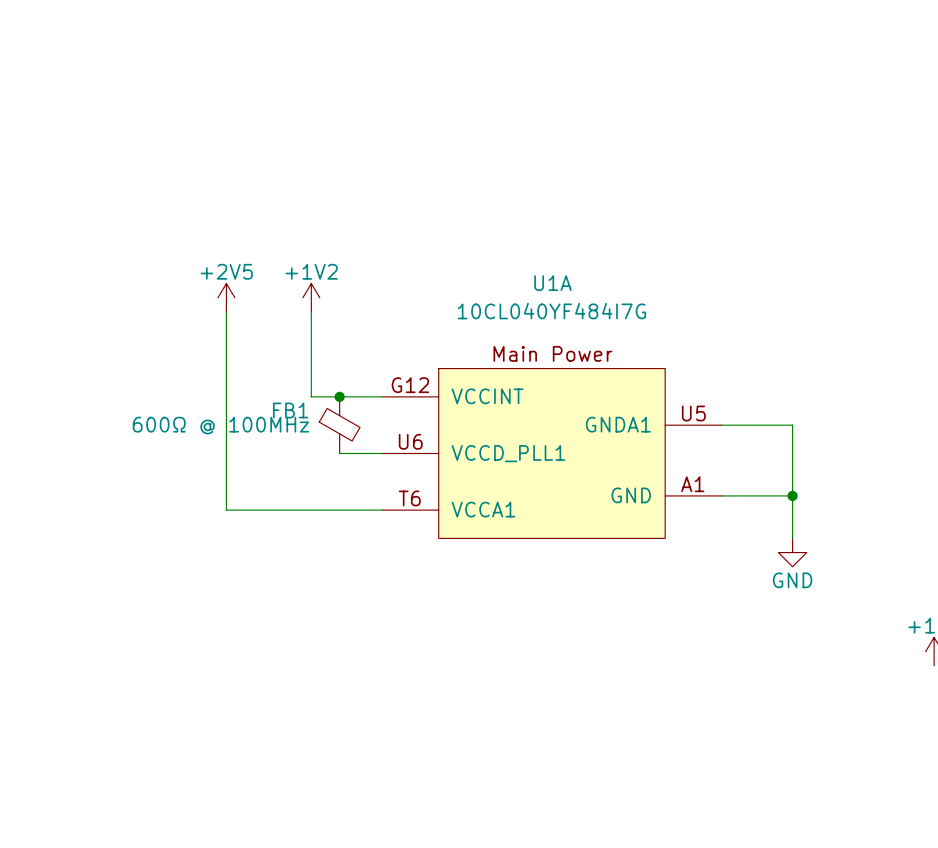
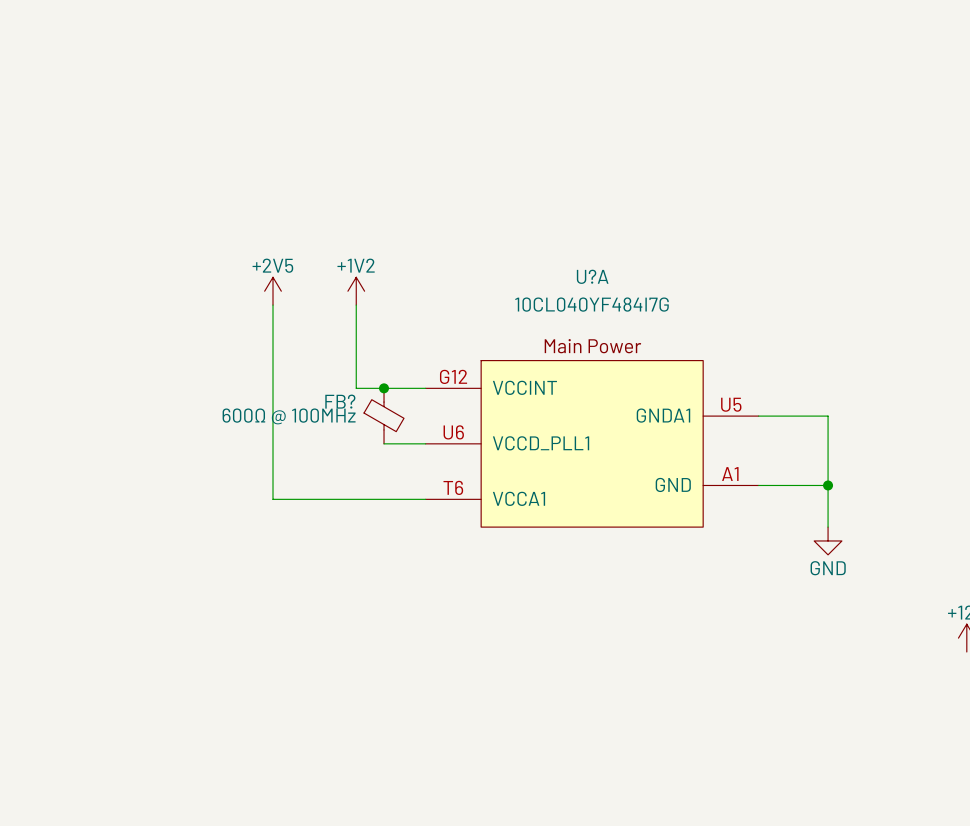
U1A name: U1A (552, 283) -> U?A (592, 276)
FB1 name: FB1 (290, 410) -> FB? (340, 401)

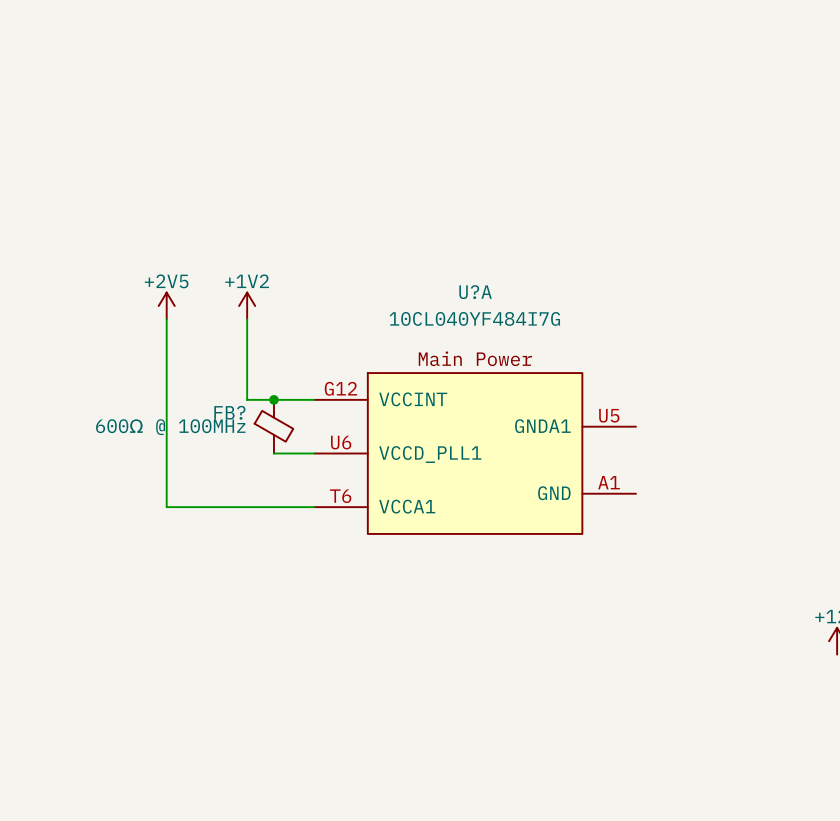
wire: (758, 416) (828, 416) (828, 527) -> none
wire: (758, 485) (828, 485) -> none
junction: (828, 485) -> none
power symbol: GND (828, 540) -> none

